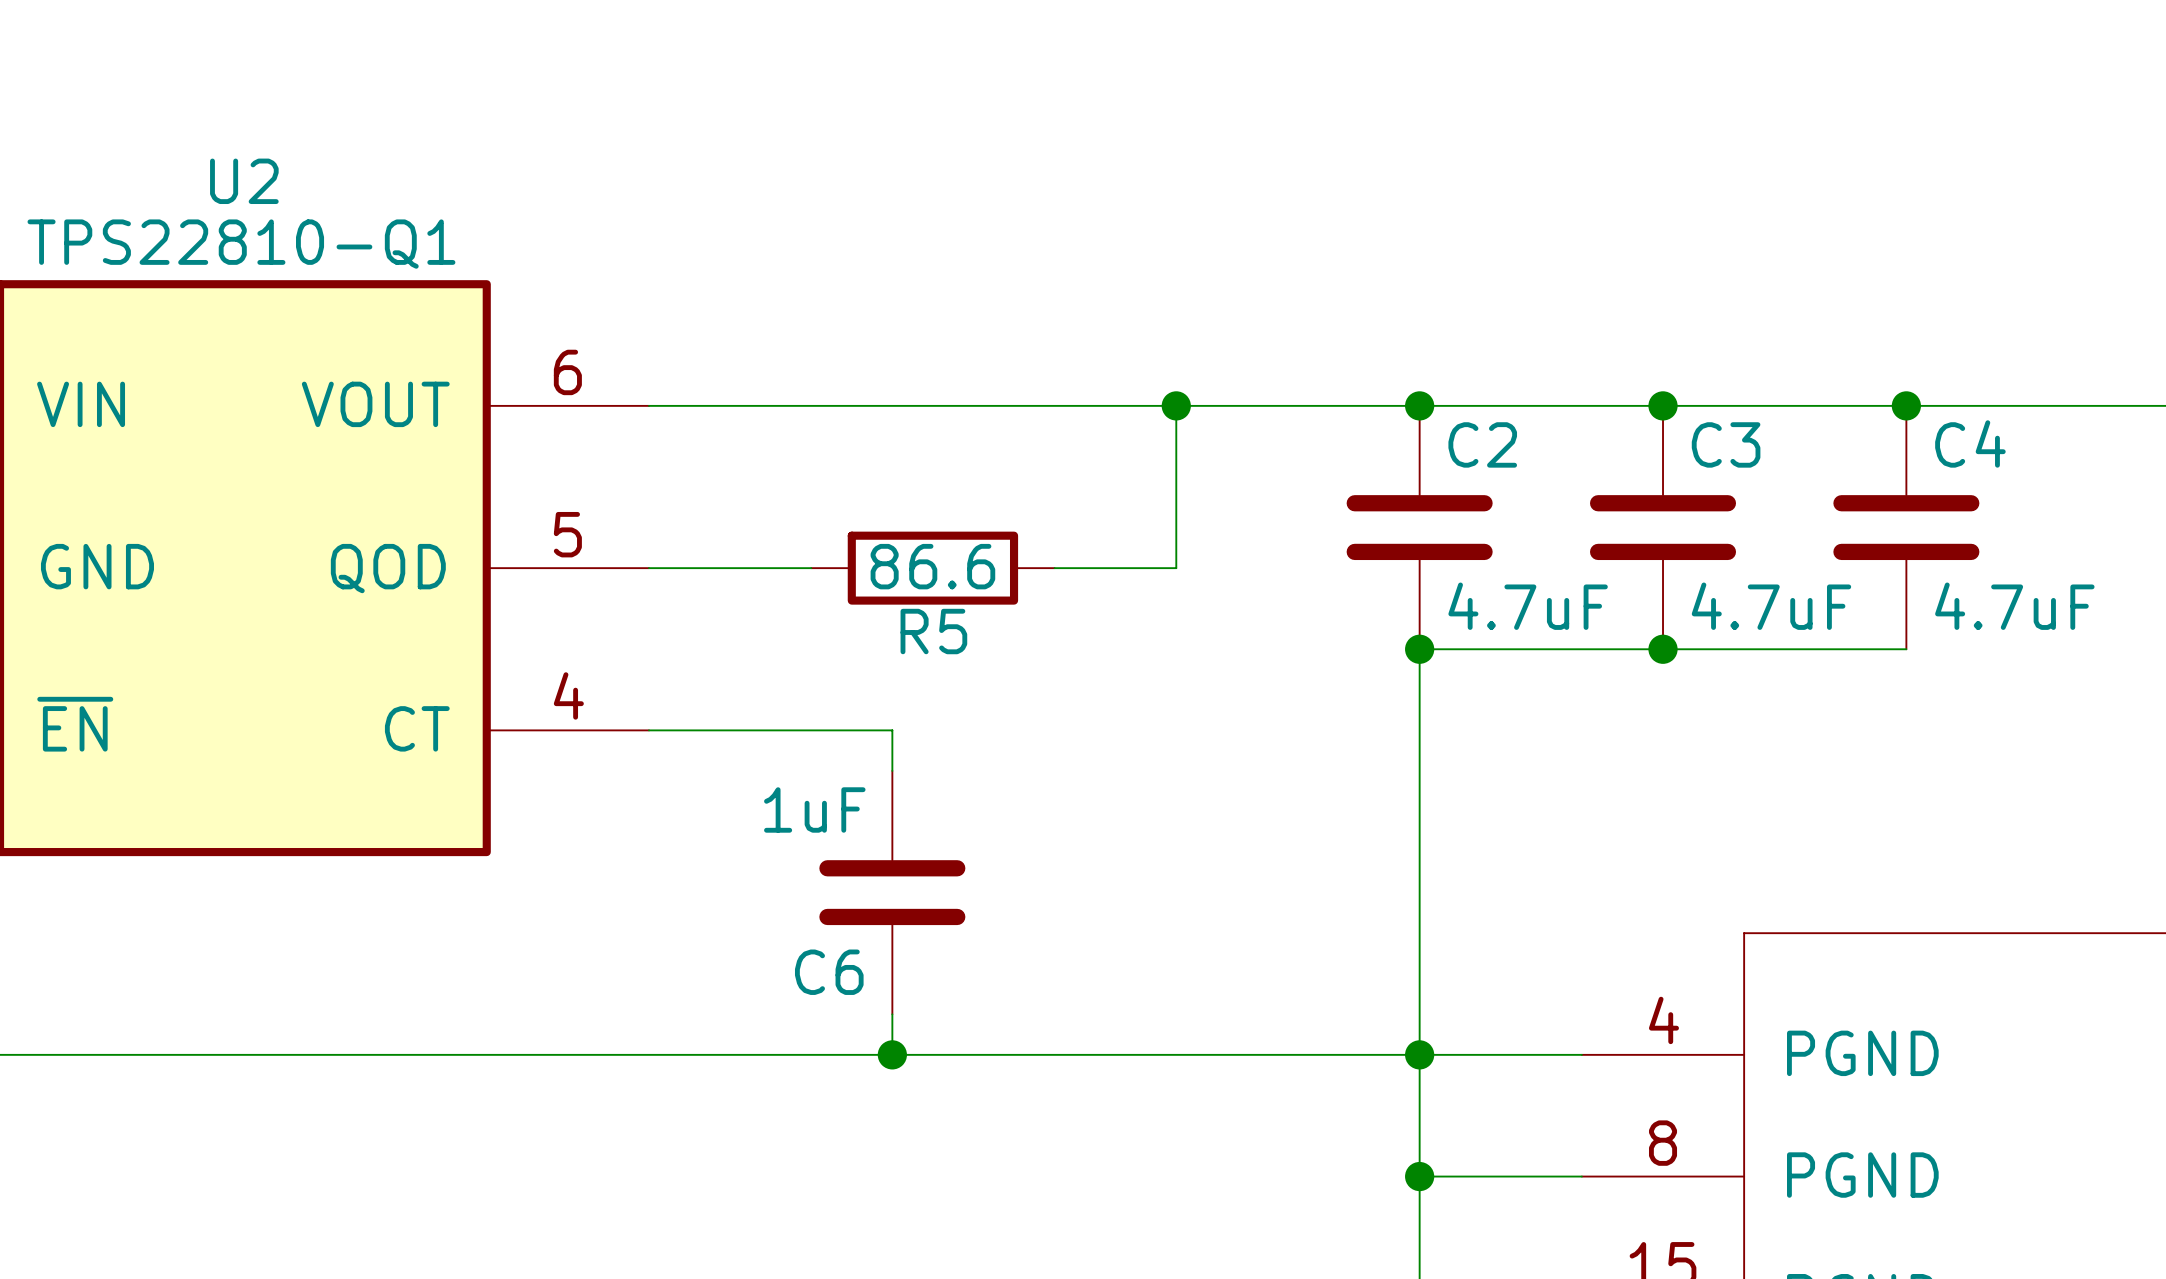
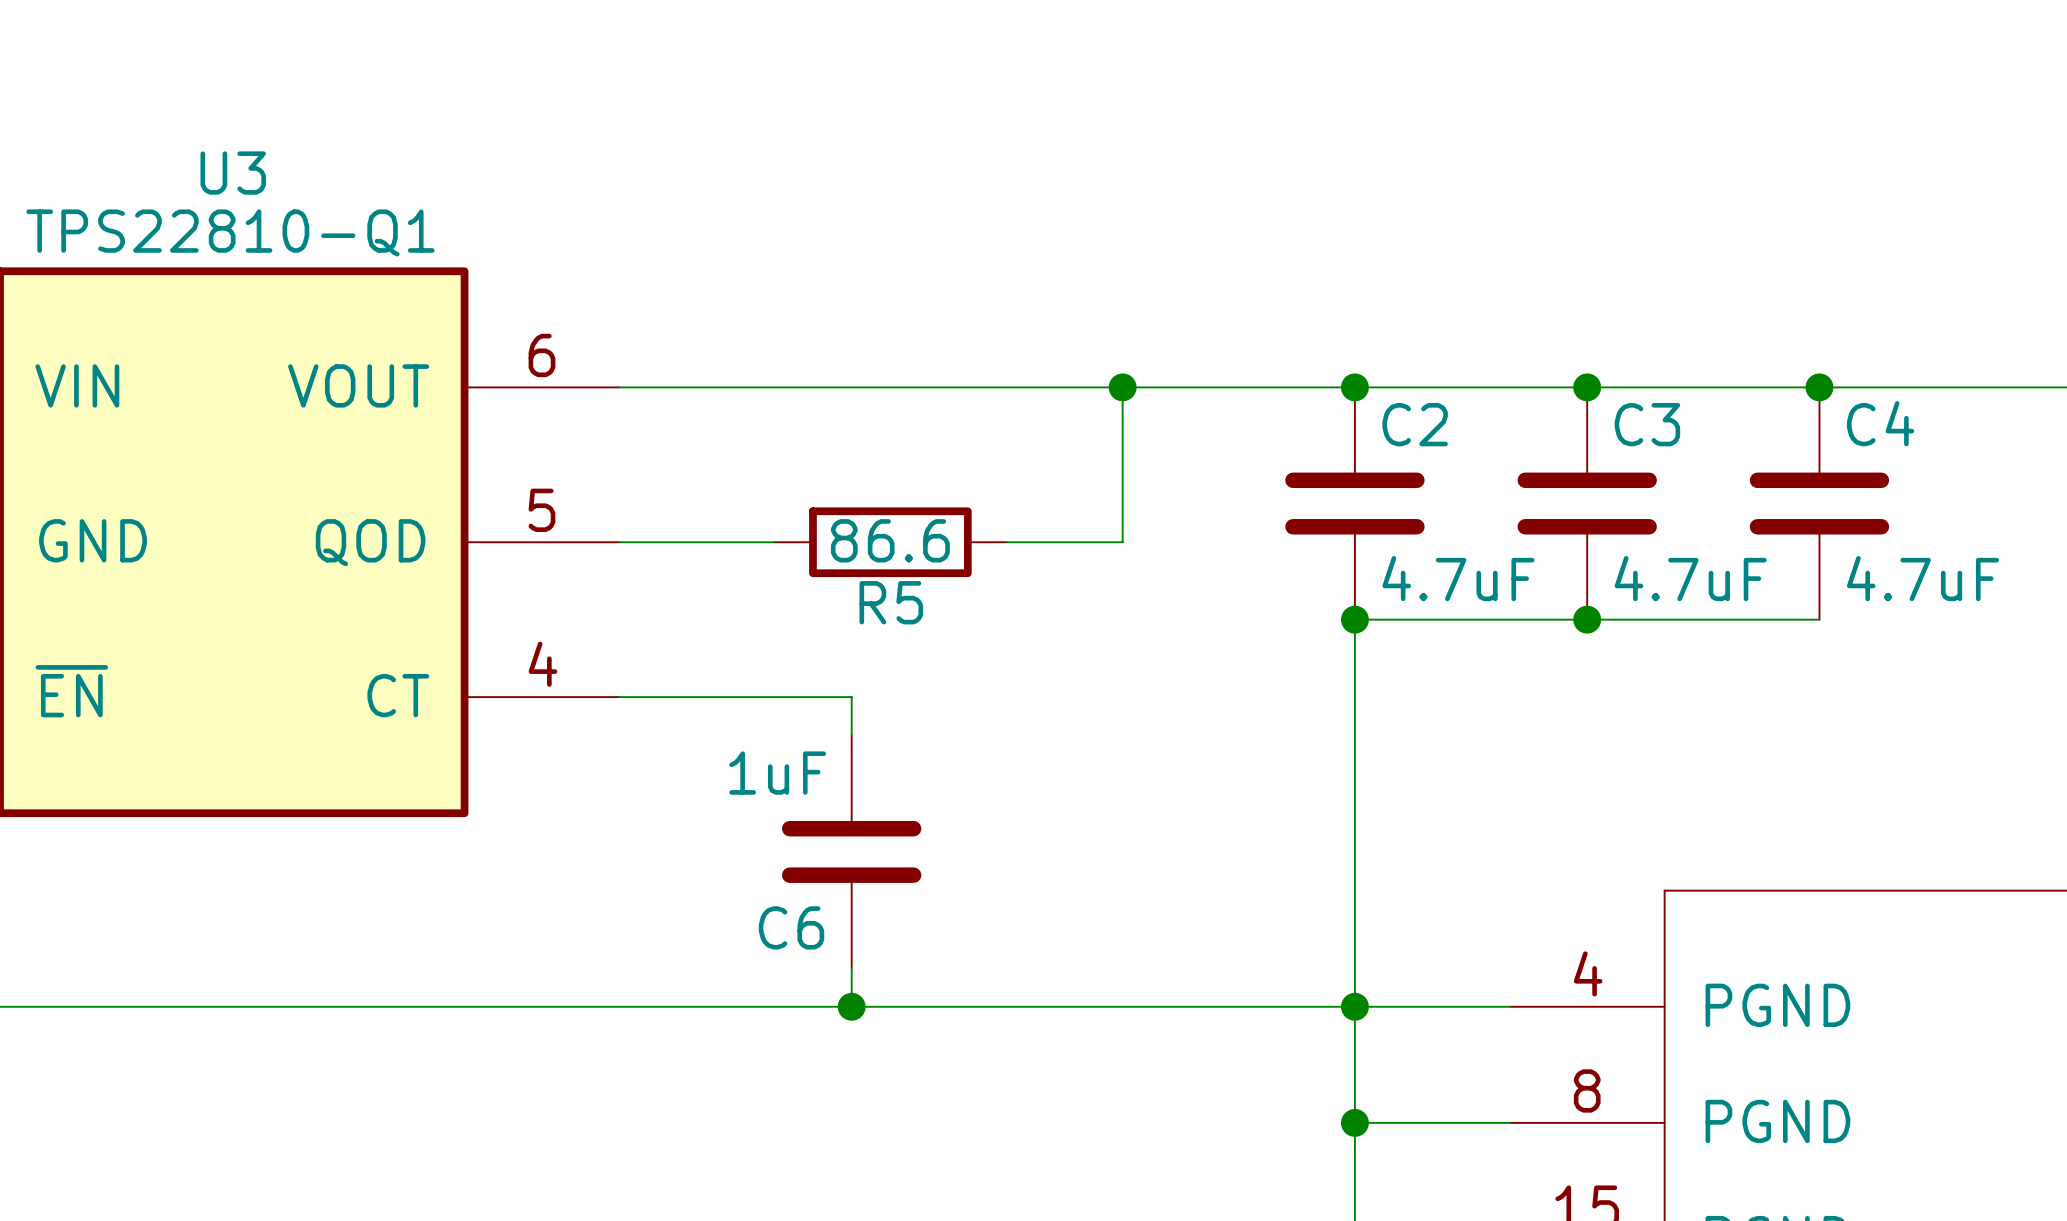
U2 name: U2 (244, 181) -> U3 (233, 173)

